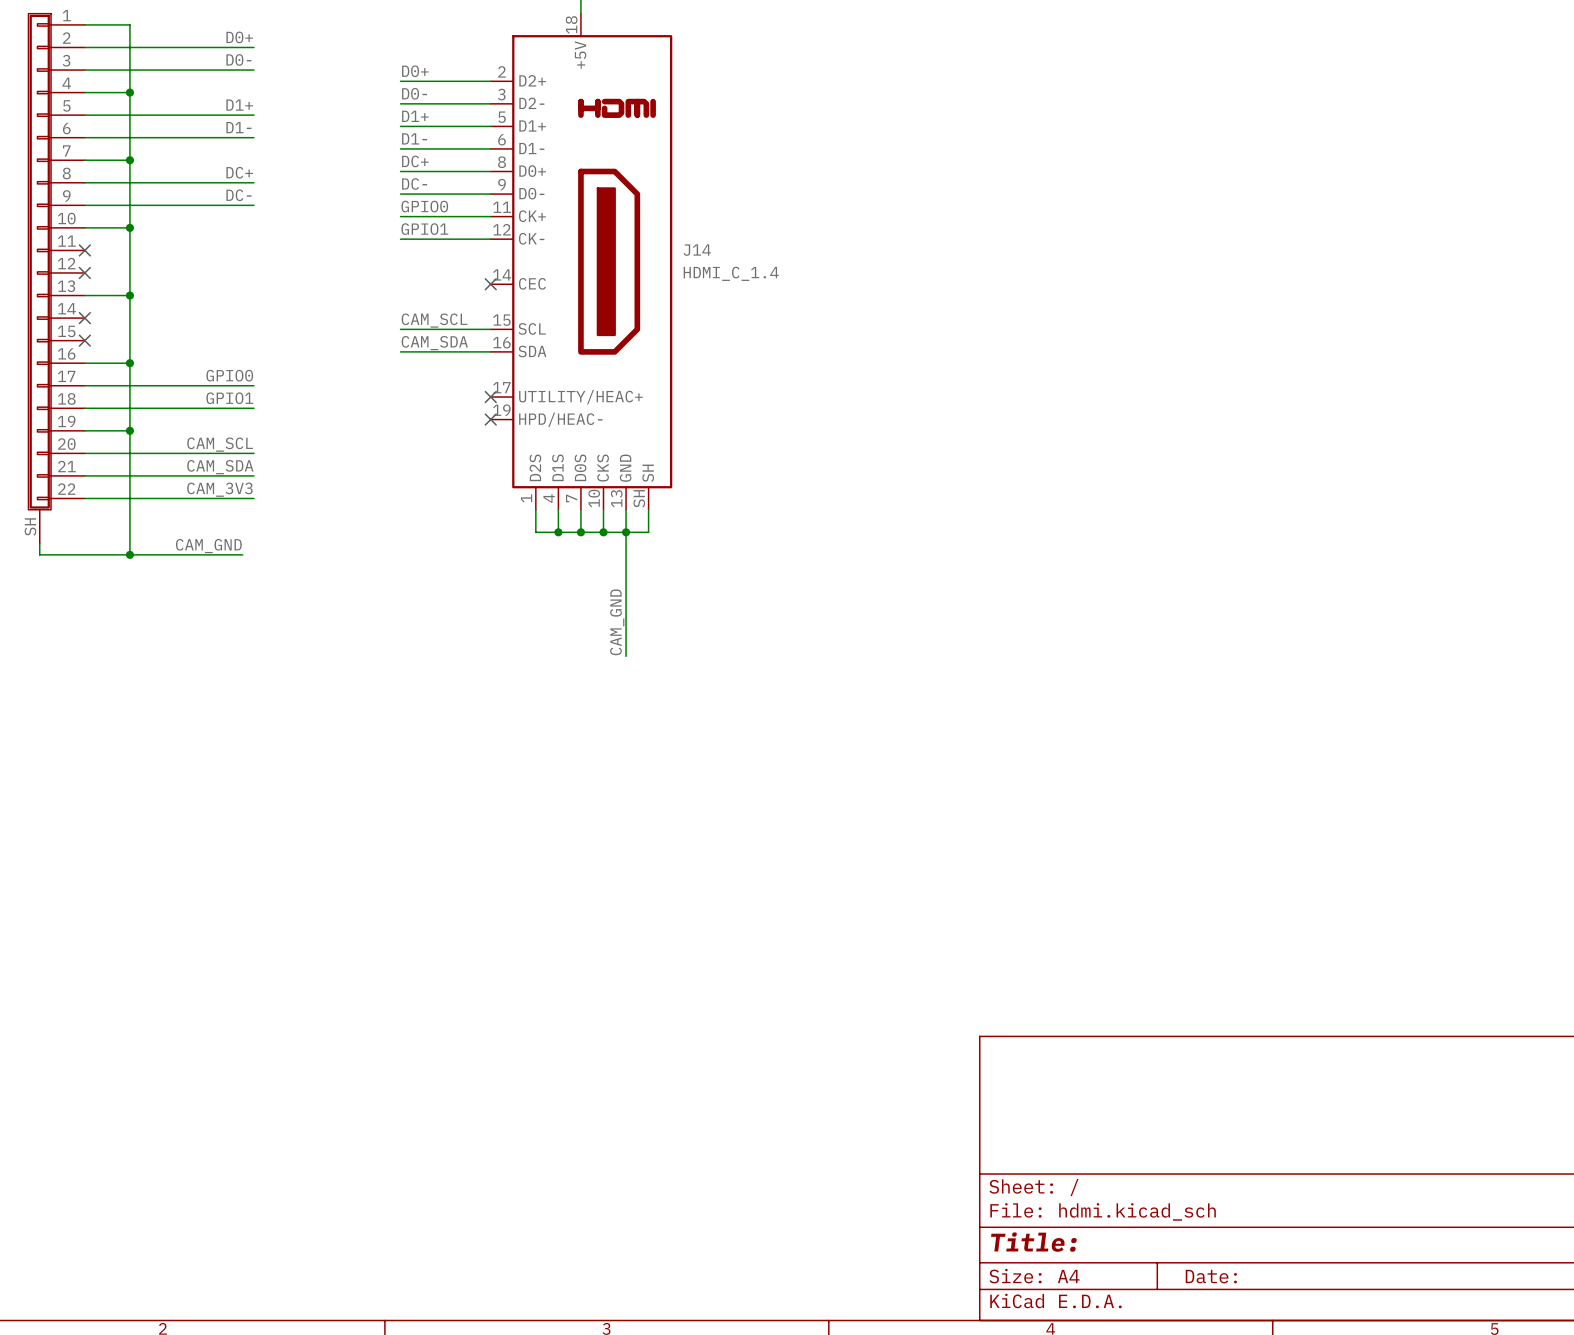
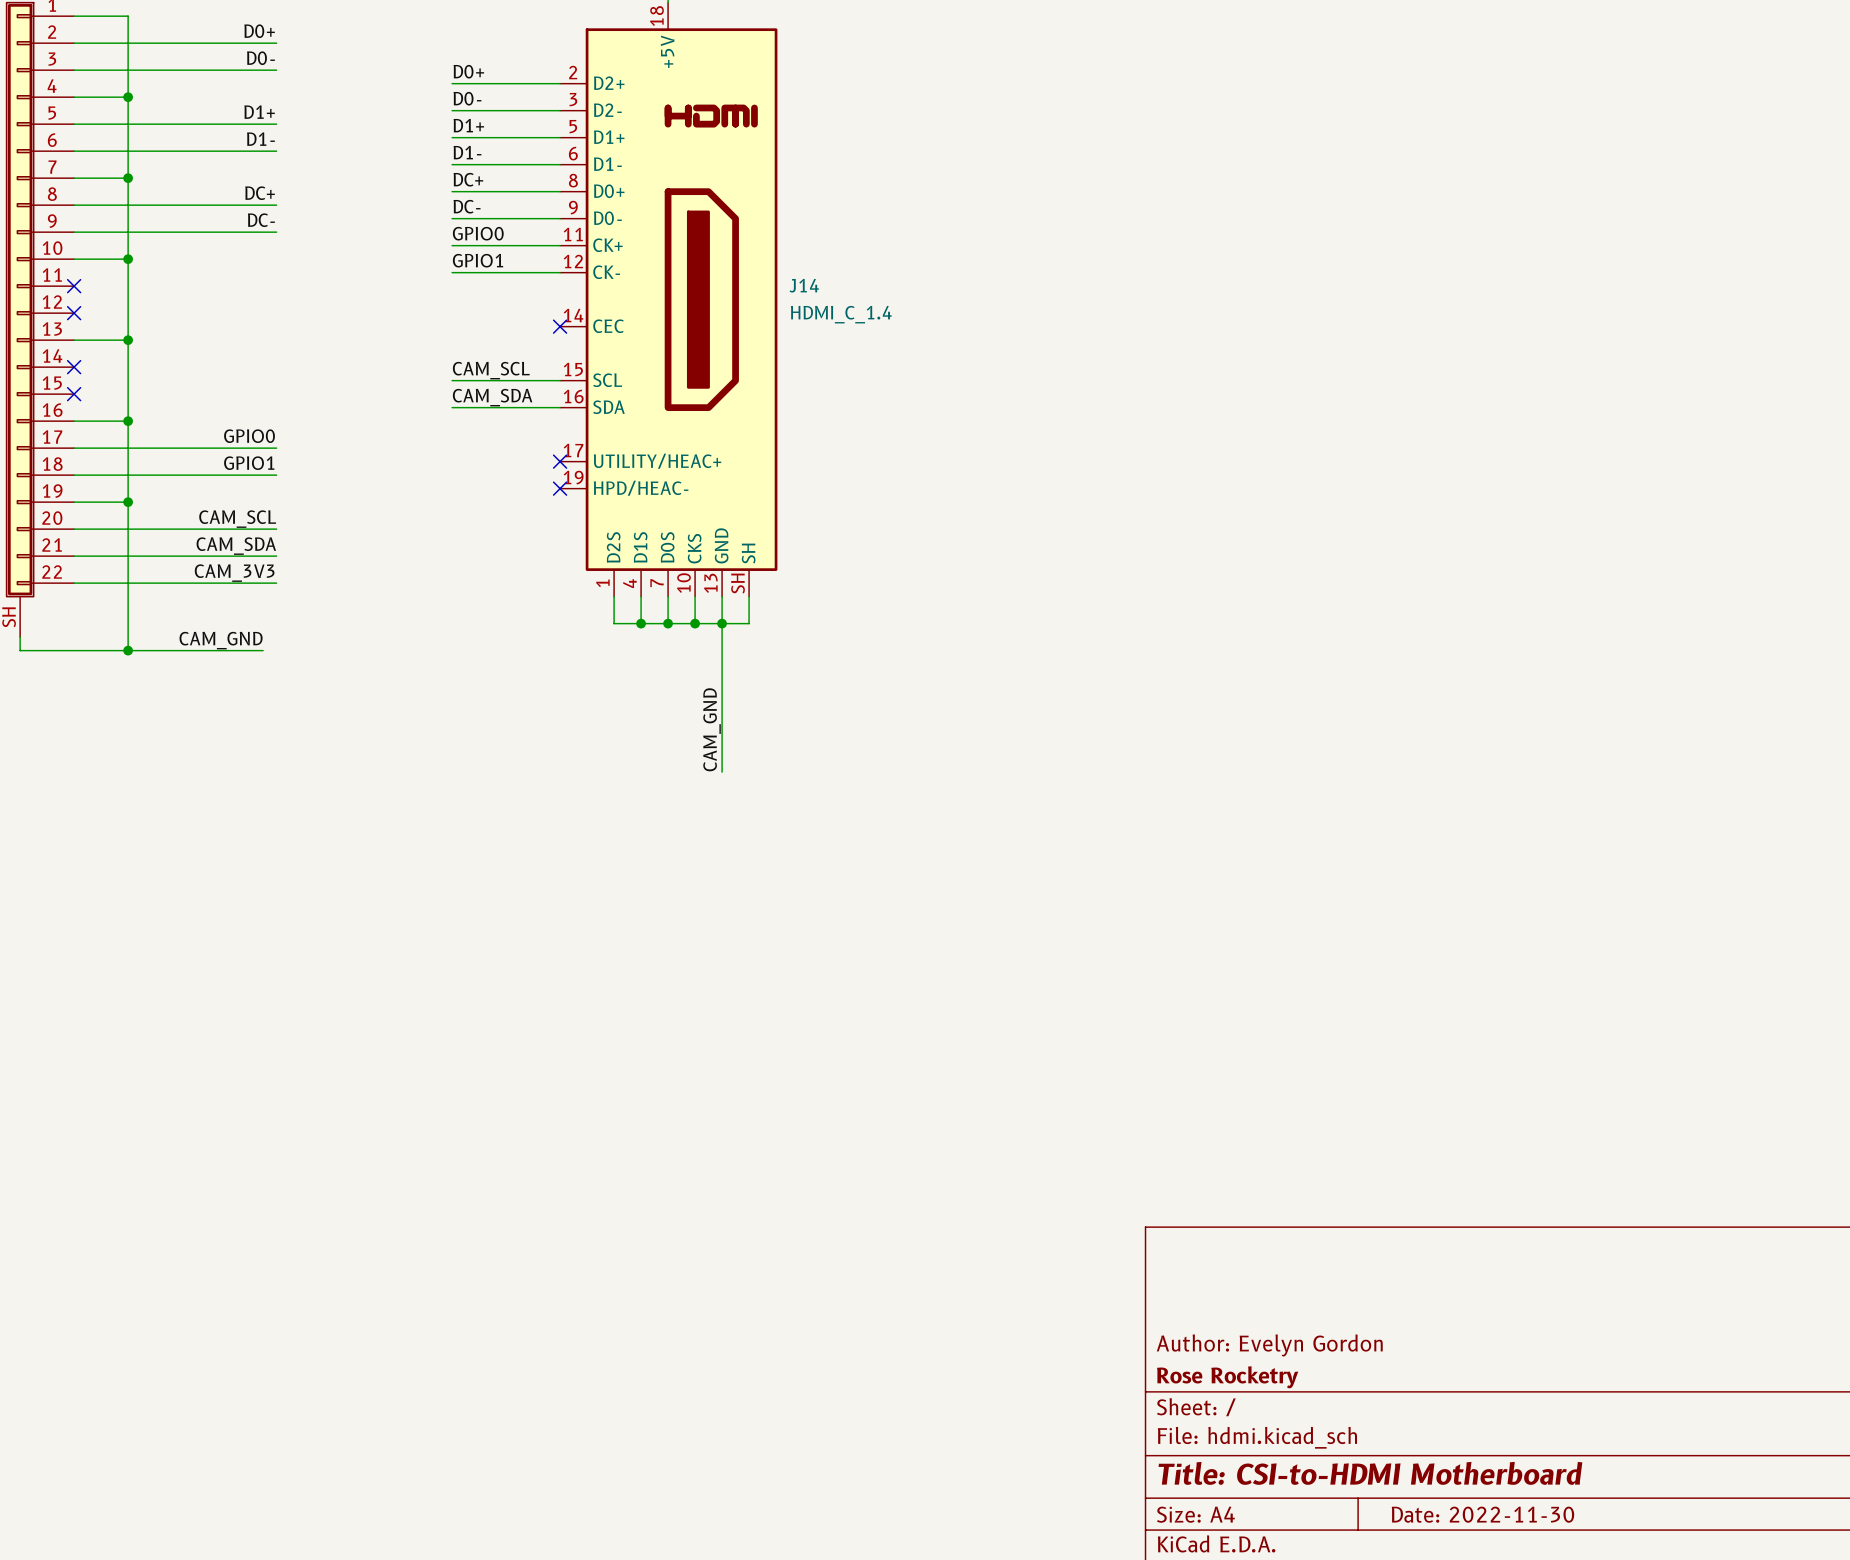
title block: none -> Author: Evelyn Gordon (1269, 1345)
title block: none -> Rose Rocketry (1227, 1377)
title block: Title: (1033, 1242) -> Title: CSI-to-HDMI Motherboard (1370, 1473)
title block: Date: (1211, 1276) -> Date: 2022-11-30 (1482, 1514)

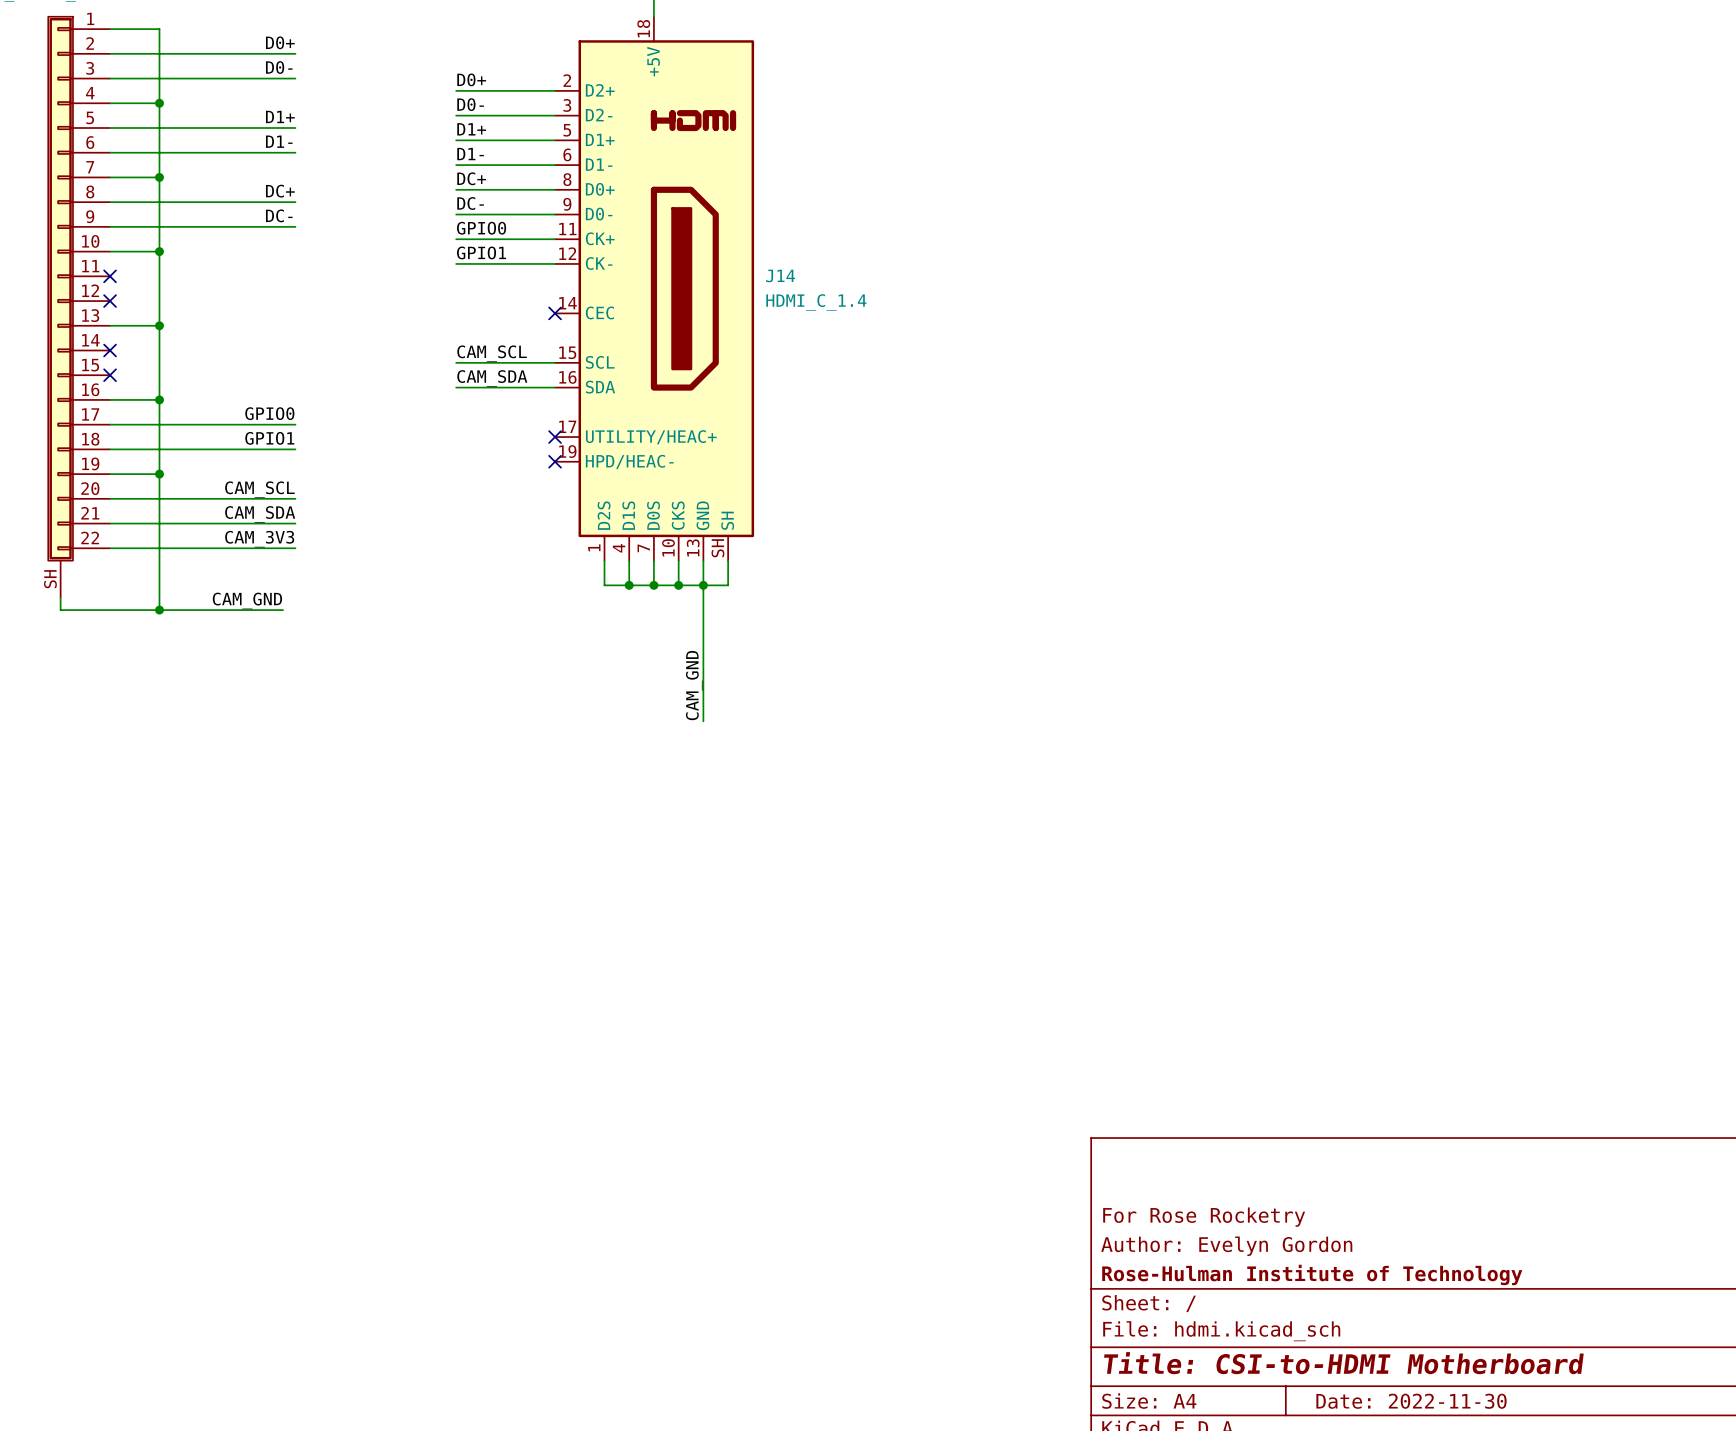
title block: none -> For Rose Rocketry (1204, 1217)
title block: Rose Rocketry (1227, 1377) -> Rose-Hulman Institute of Technology (1312, 1274)

